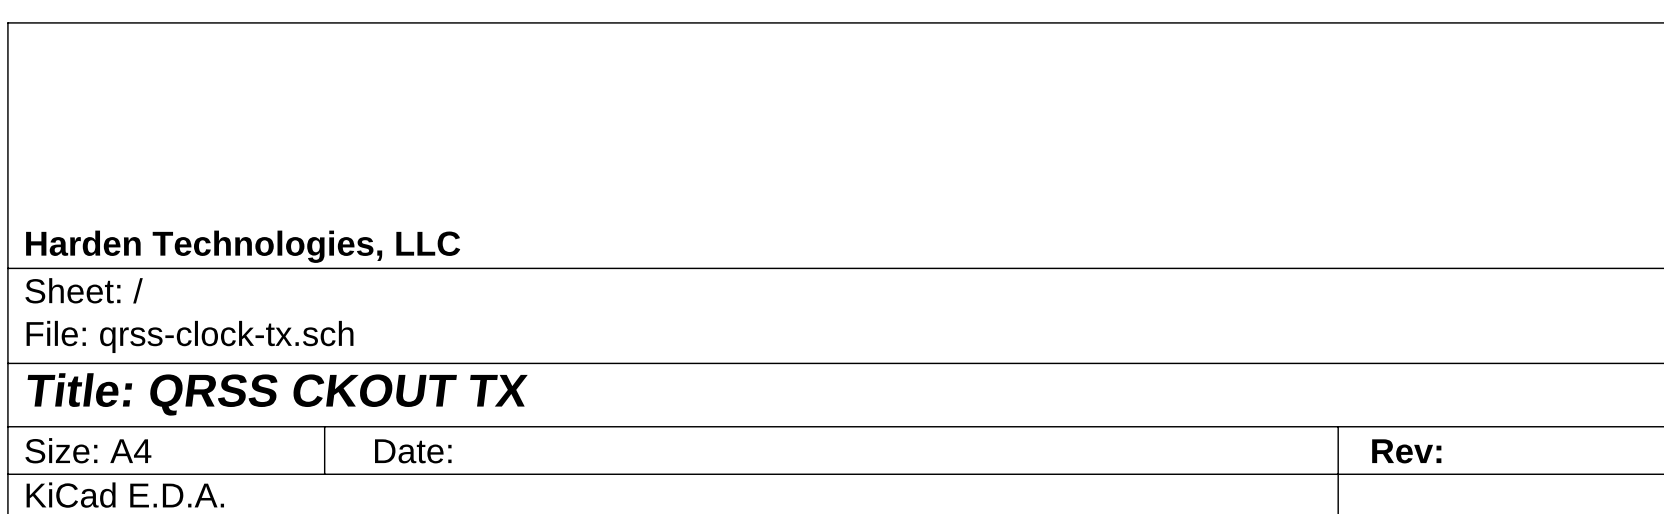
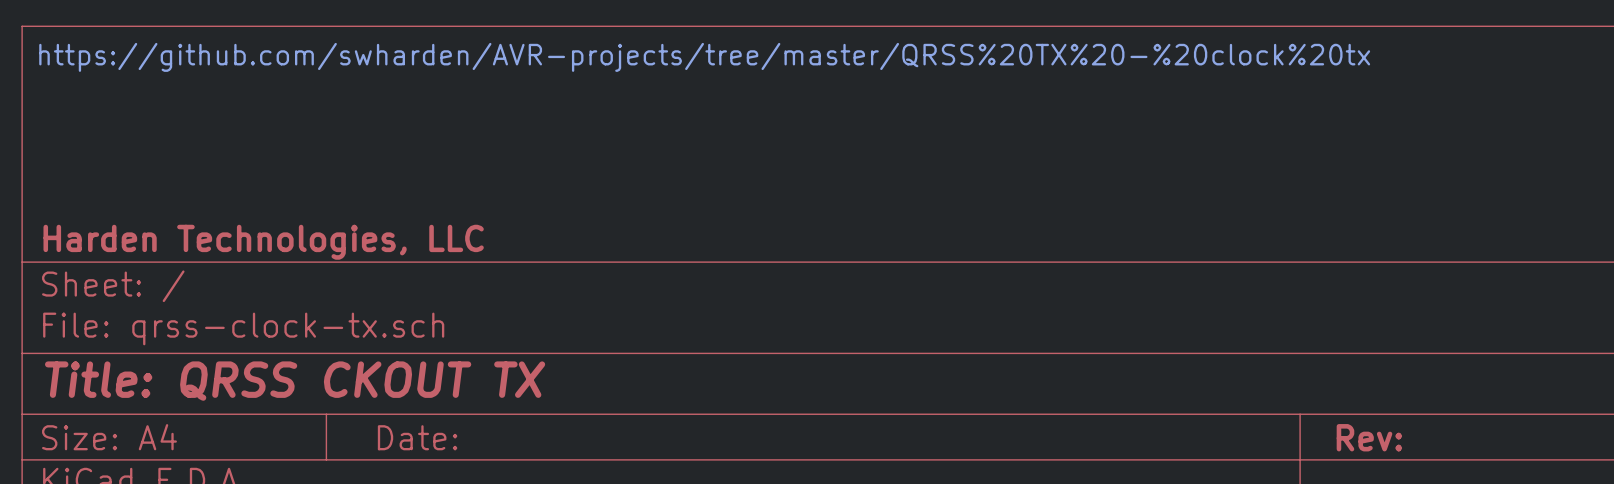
text: none -> https://github.com/swharden/AVR-projects/tree/master/QRSS%20TX%20-%20clock%20tx (704, 57)

